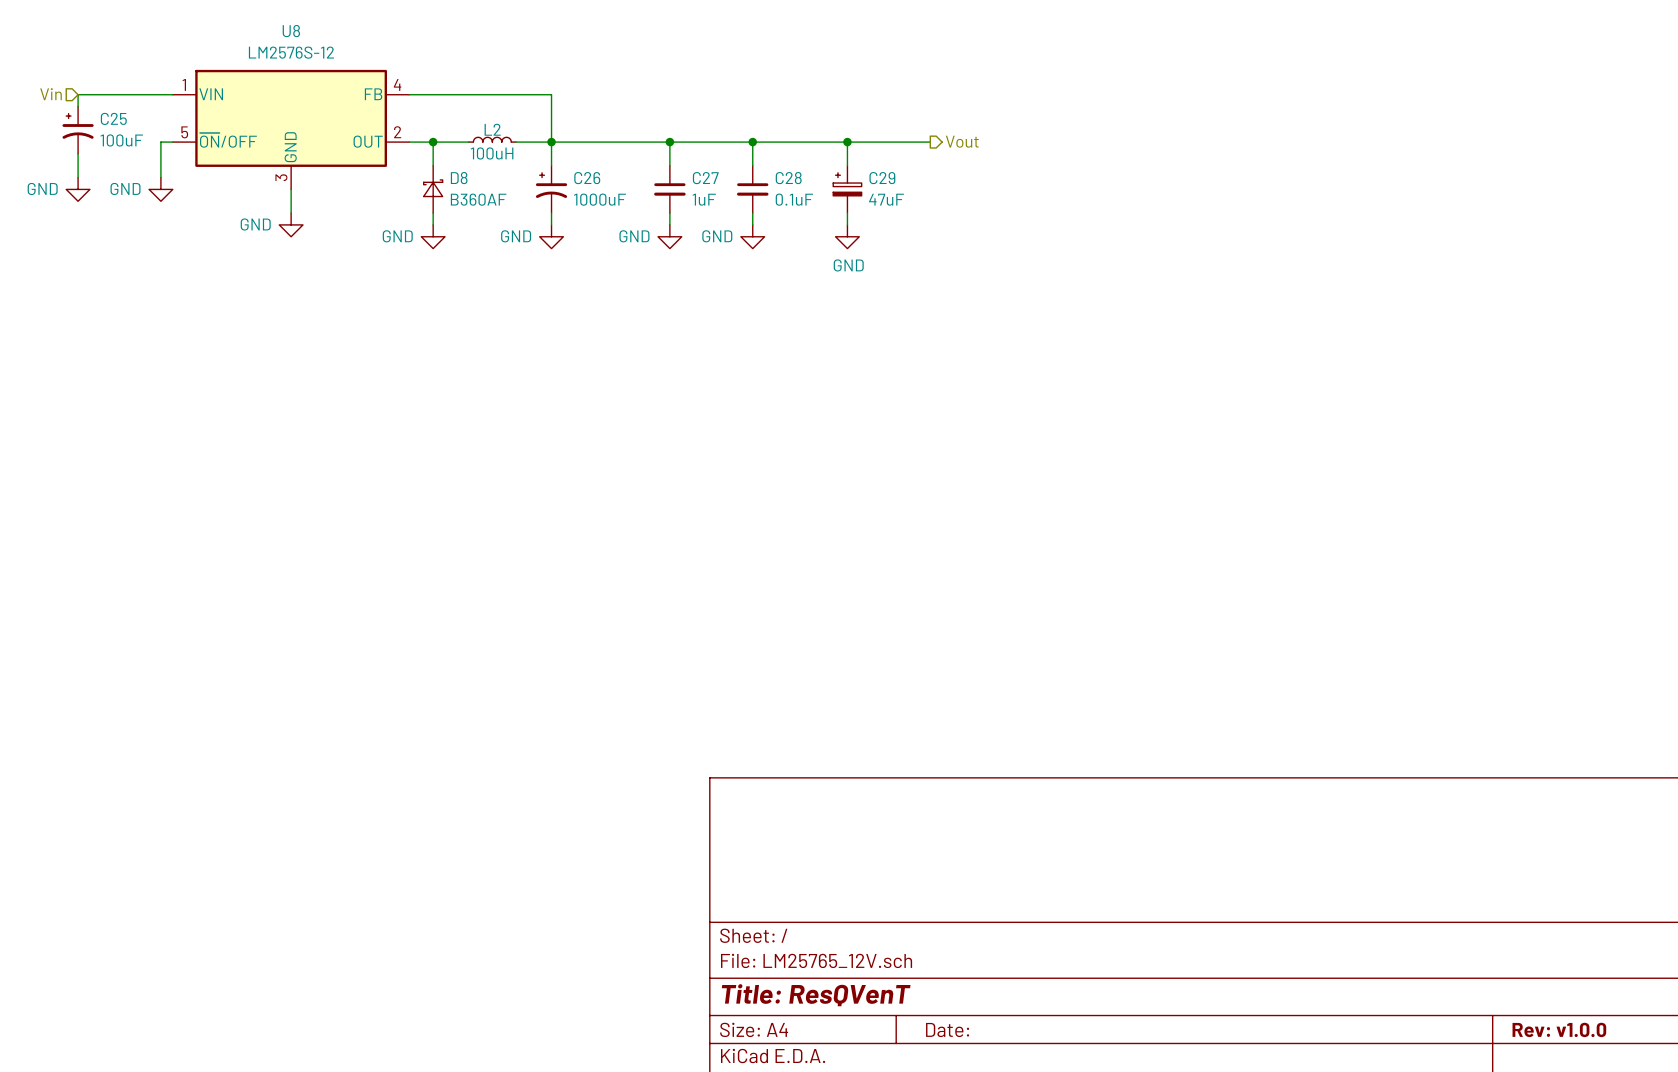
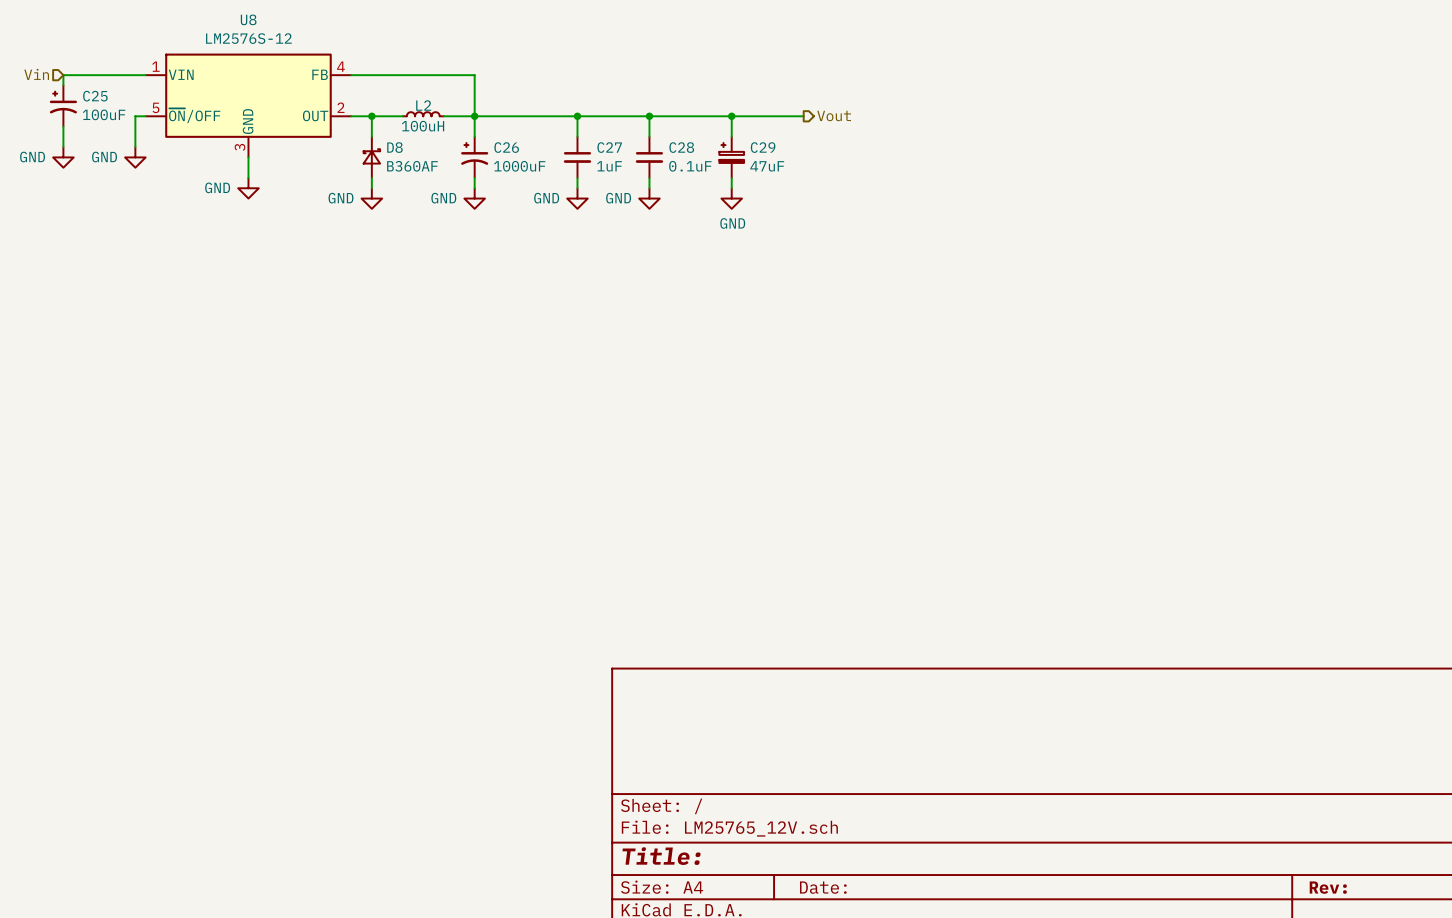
title block: Title: ResQVenT (816, 995) -> Title: (661, 856)
title block: Rev: v1.0.0 (1559, 1029) -> Rev: (1328, 887)

